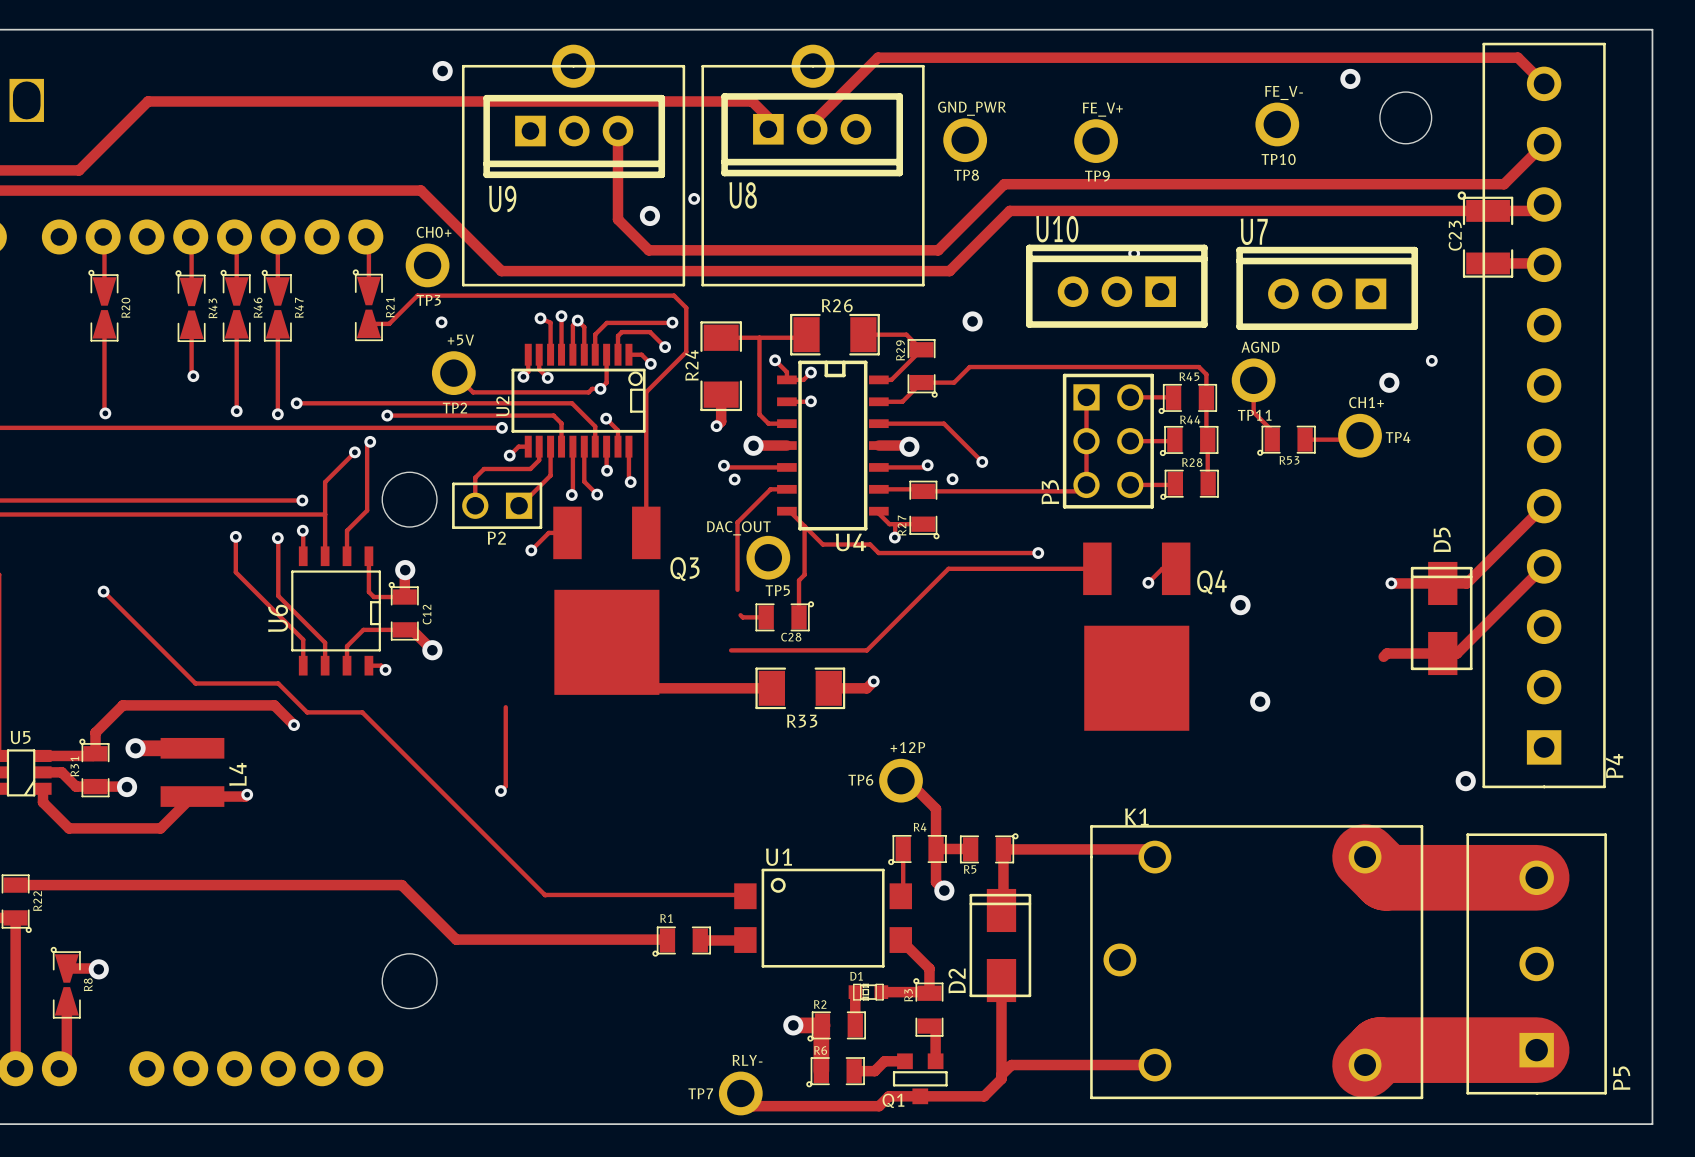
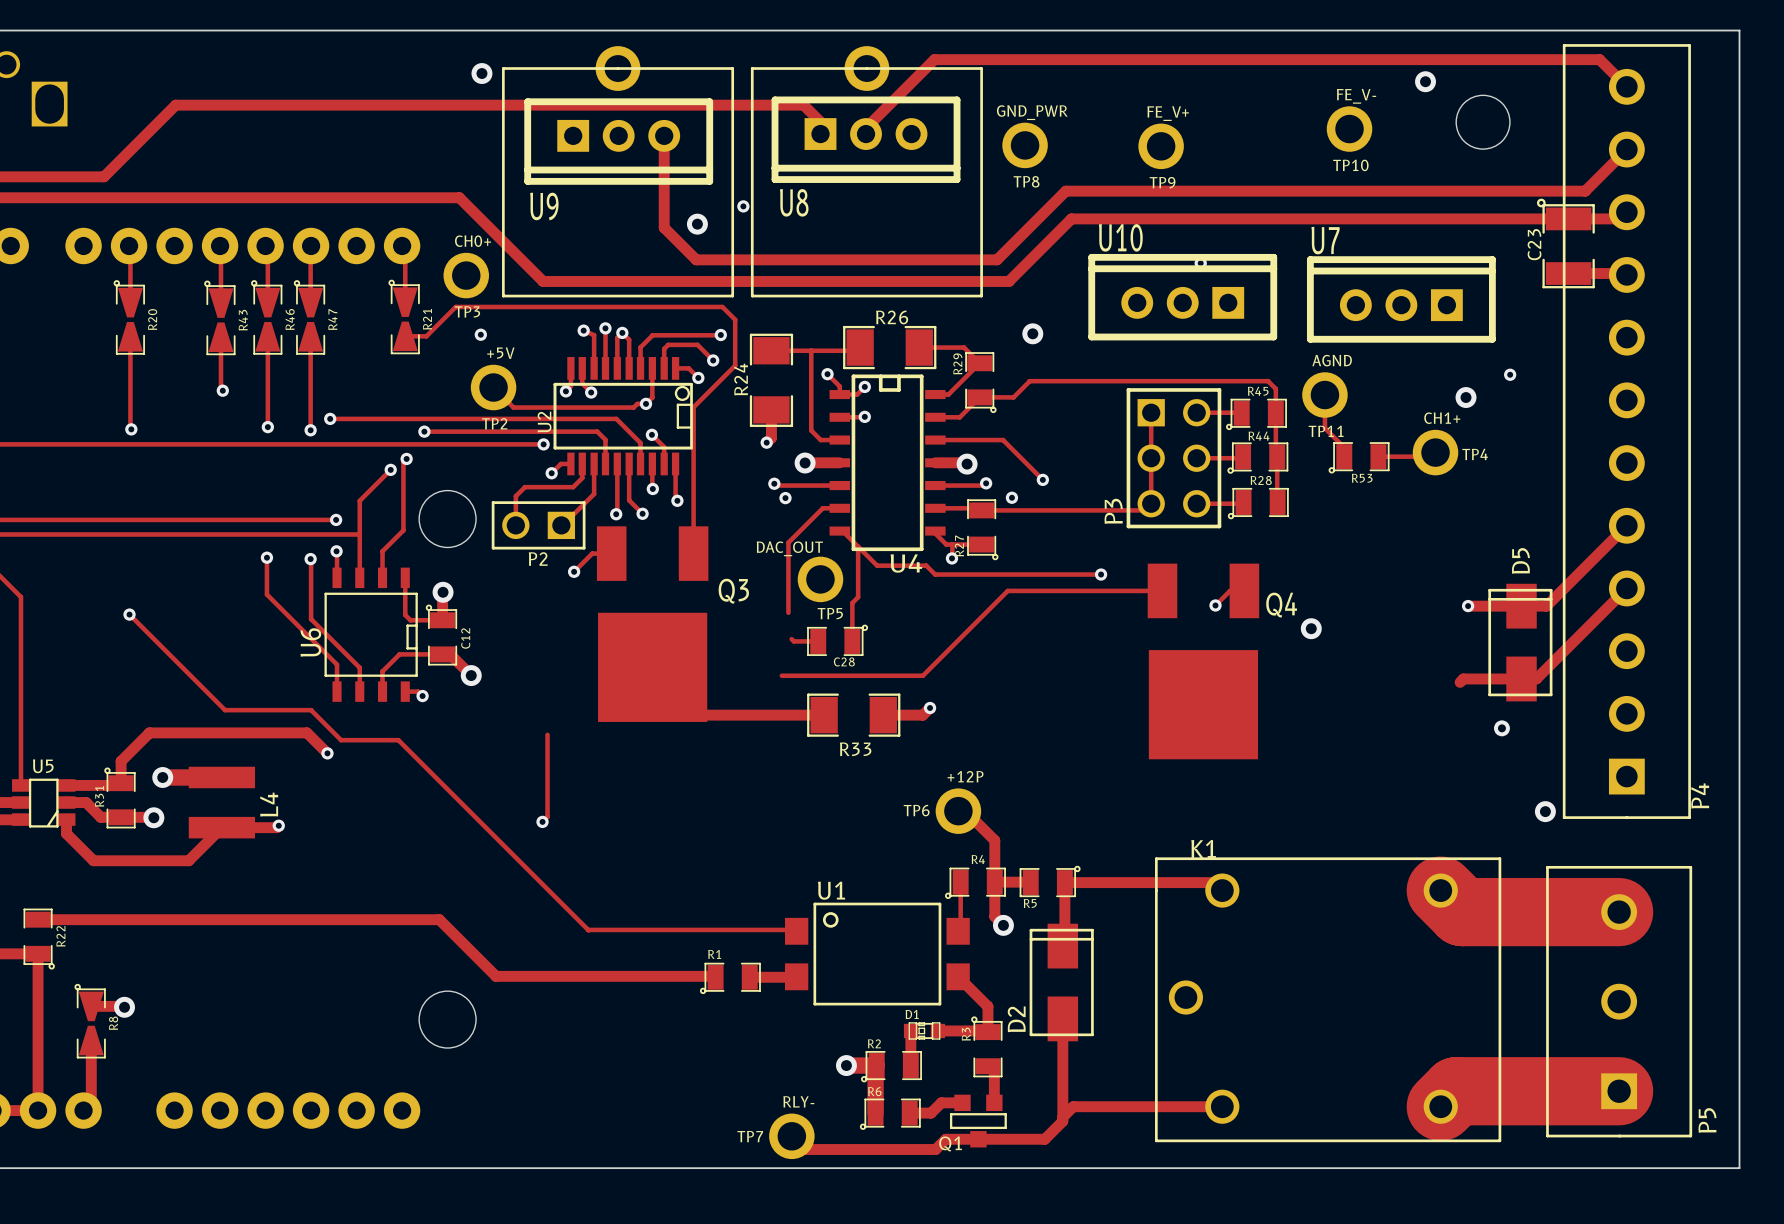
via: (1260, 701) -> none
via: none -> (1501, 728)

